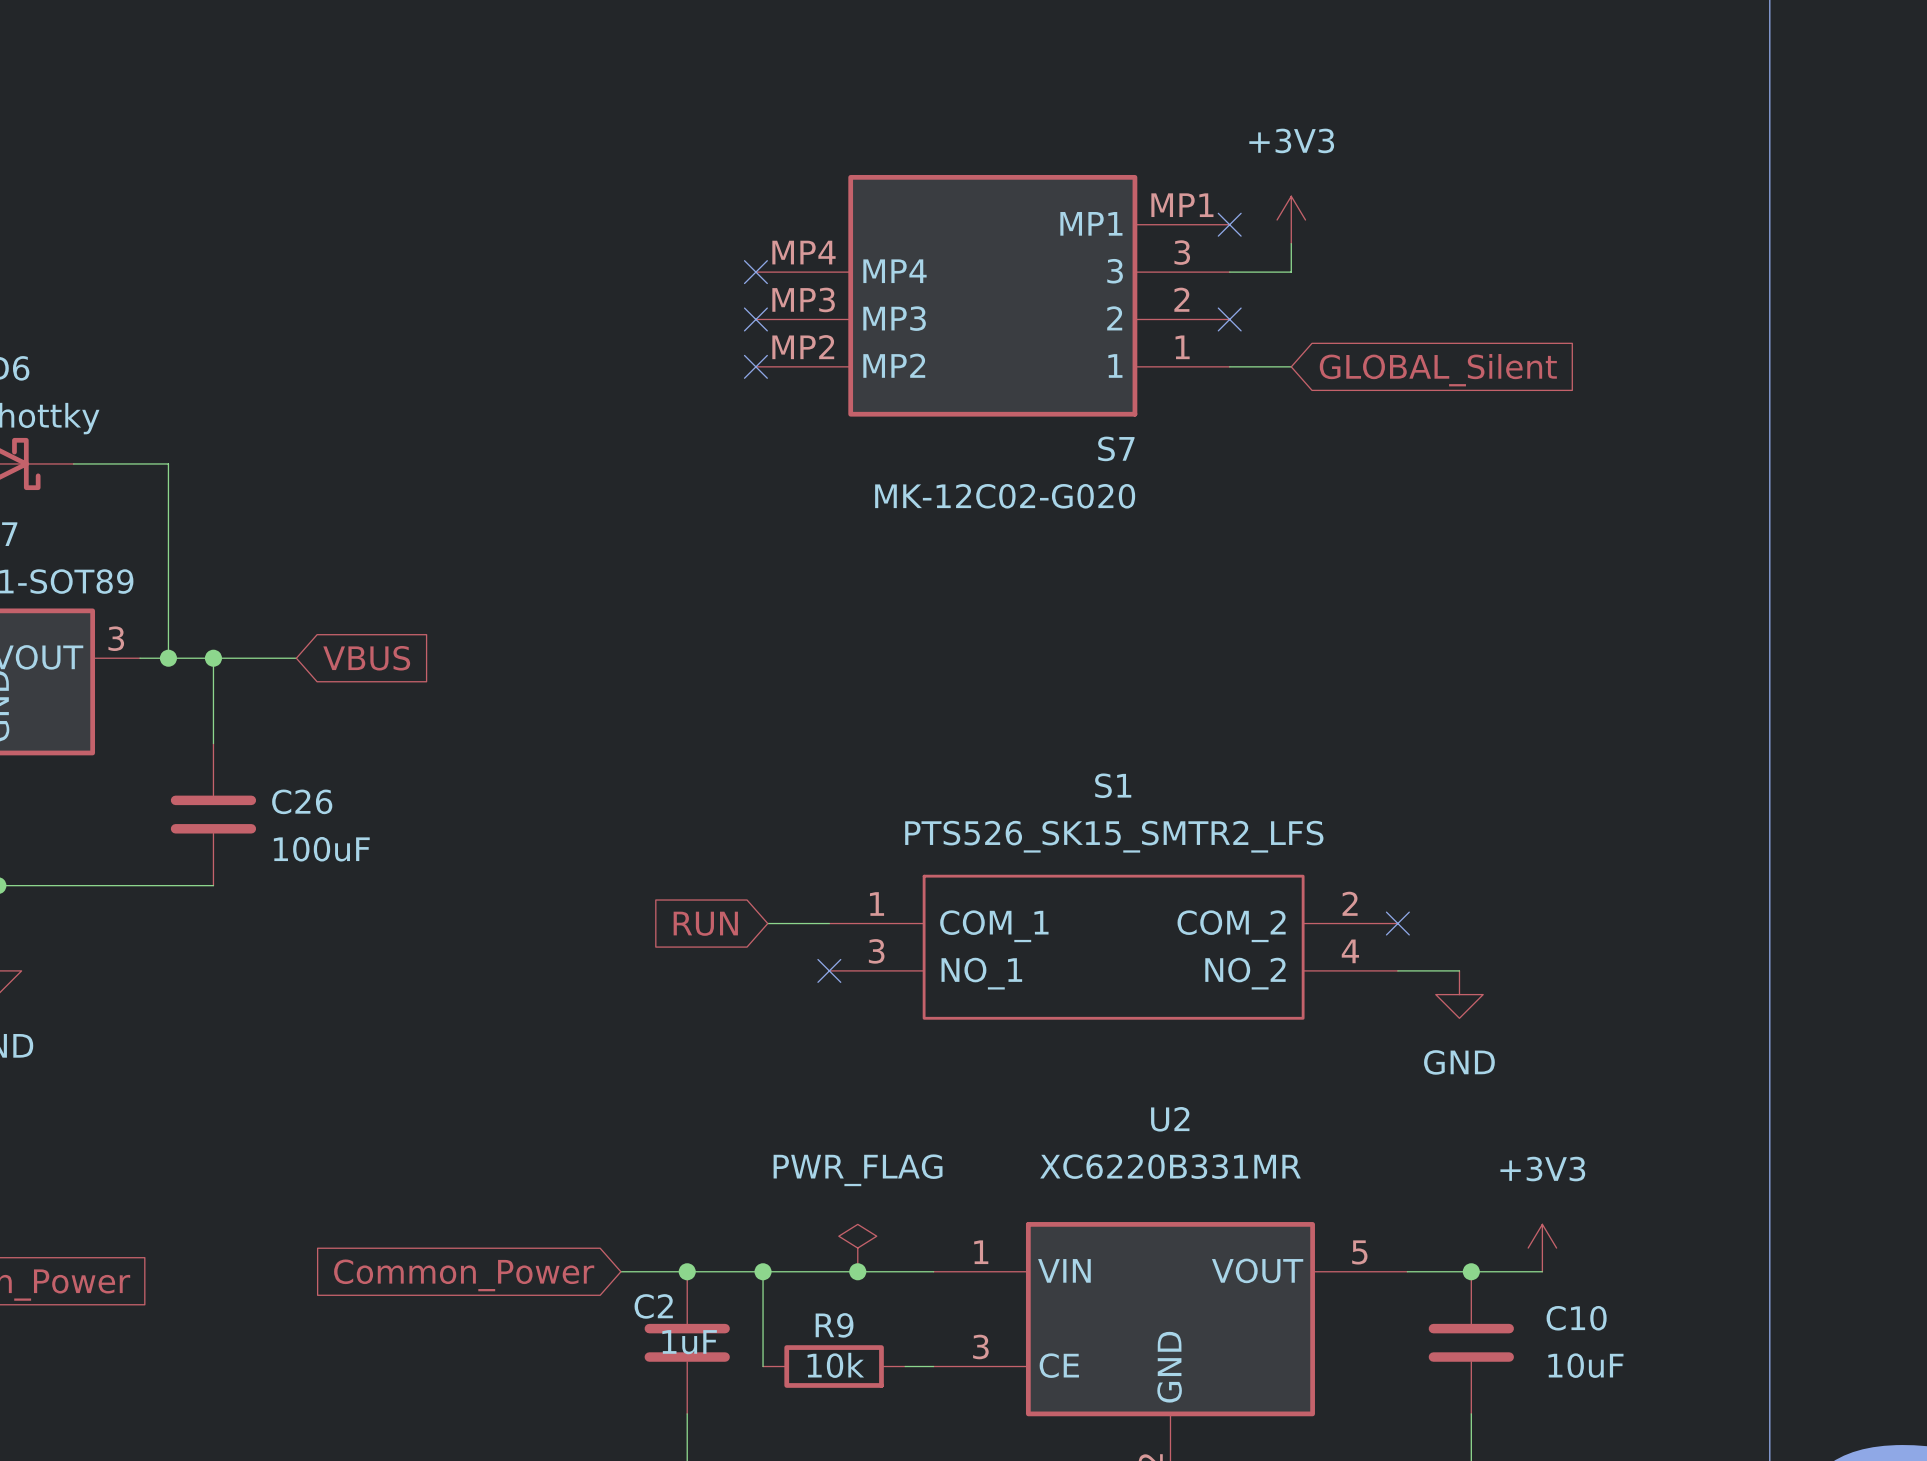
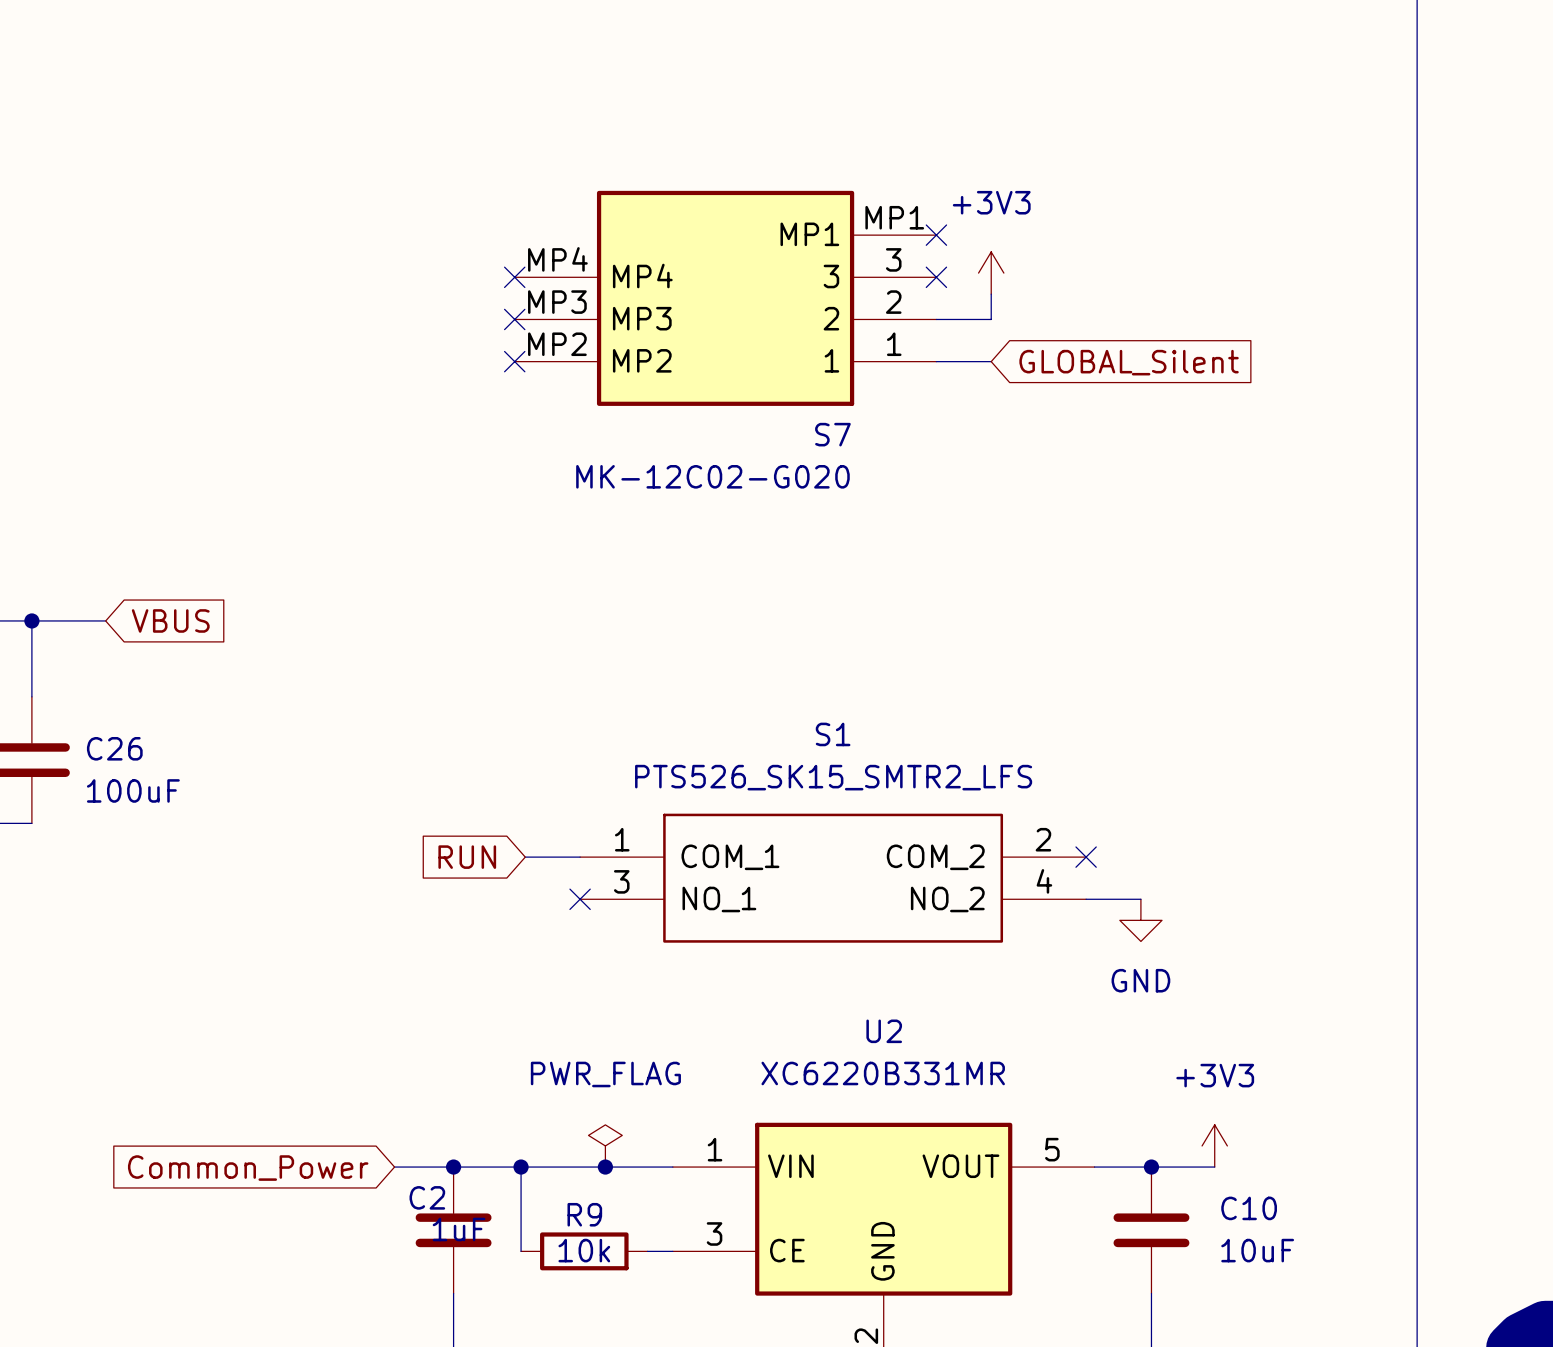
power symbol position: +3V3 (1291, 219) -> +3V3 (991, 273)
wire: (1291, 243) (1291, 272) (1229, 272) -> (991, 294) (991, 319) (936, 319)
no-connect mark position: (1229, 319) -> (936, 277)

